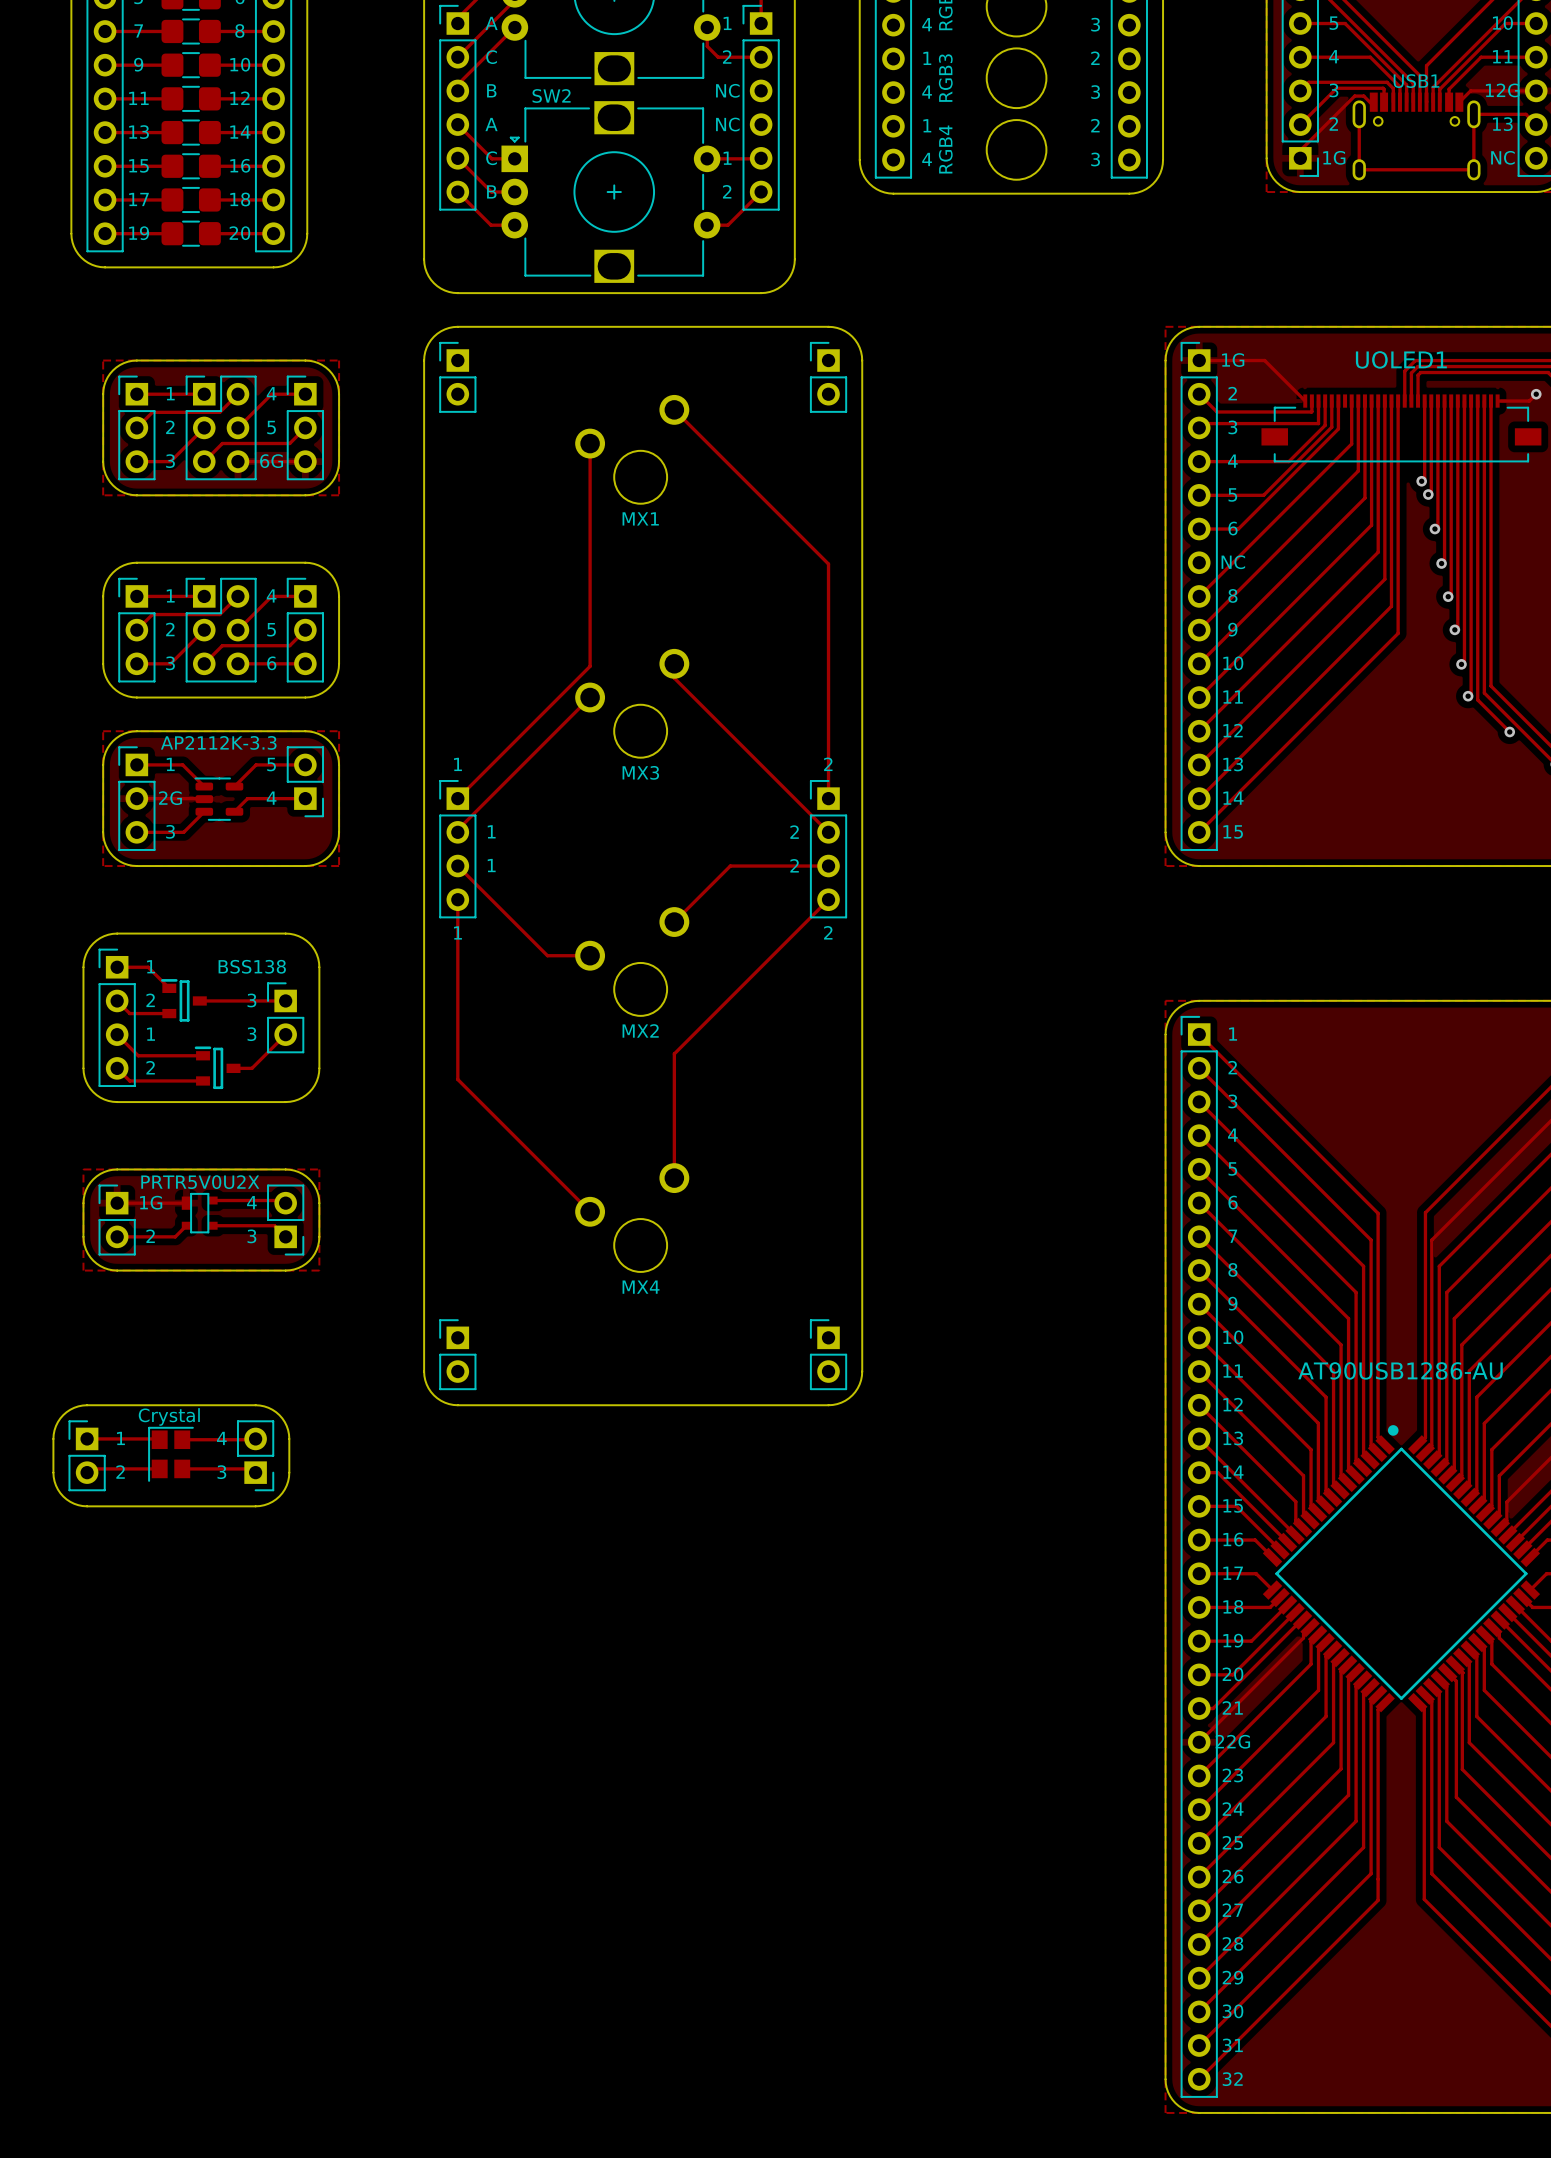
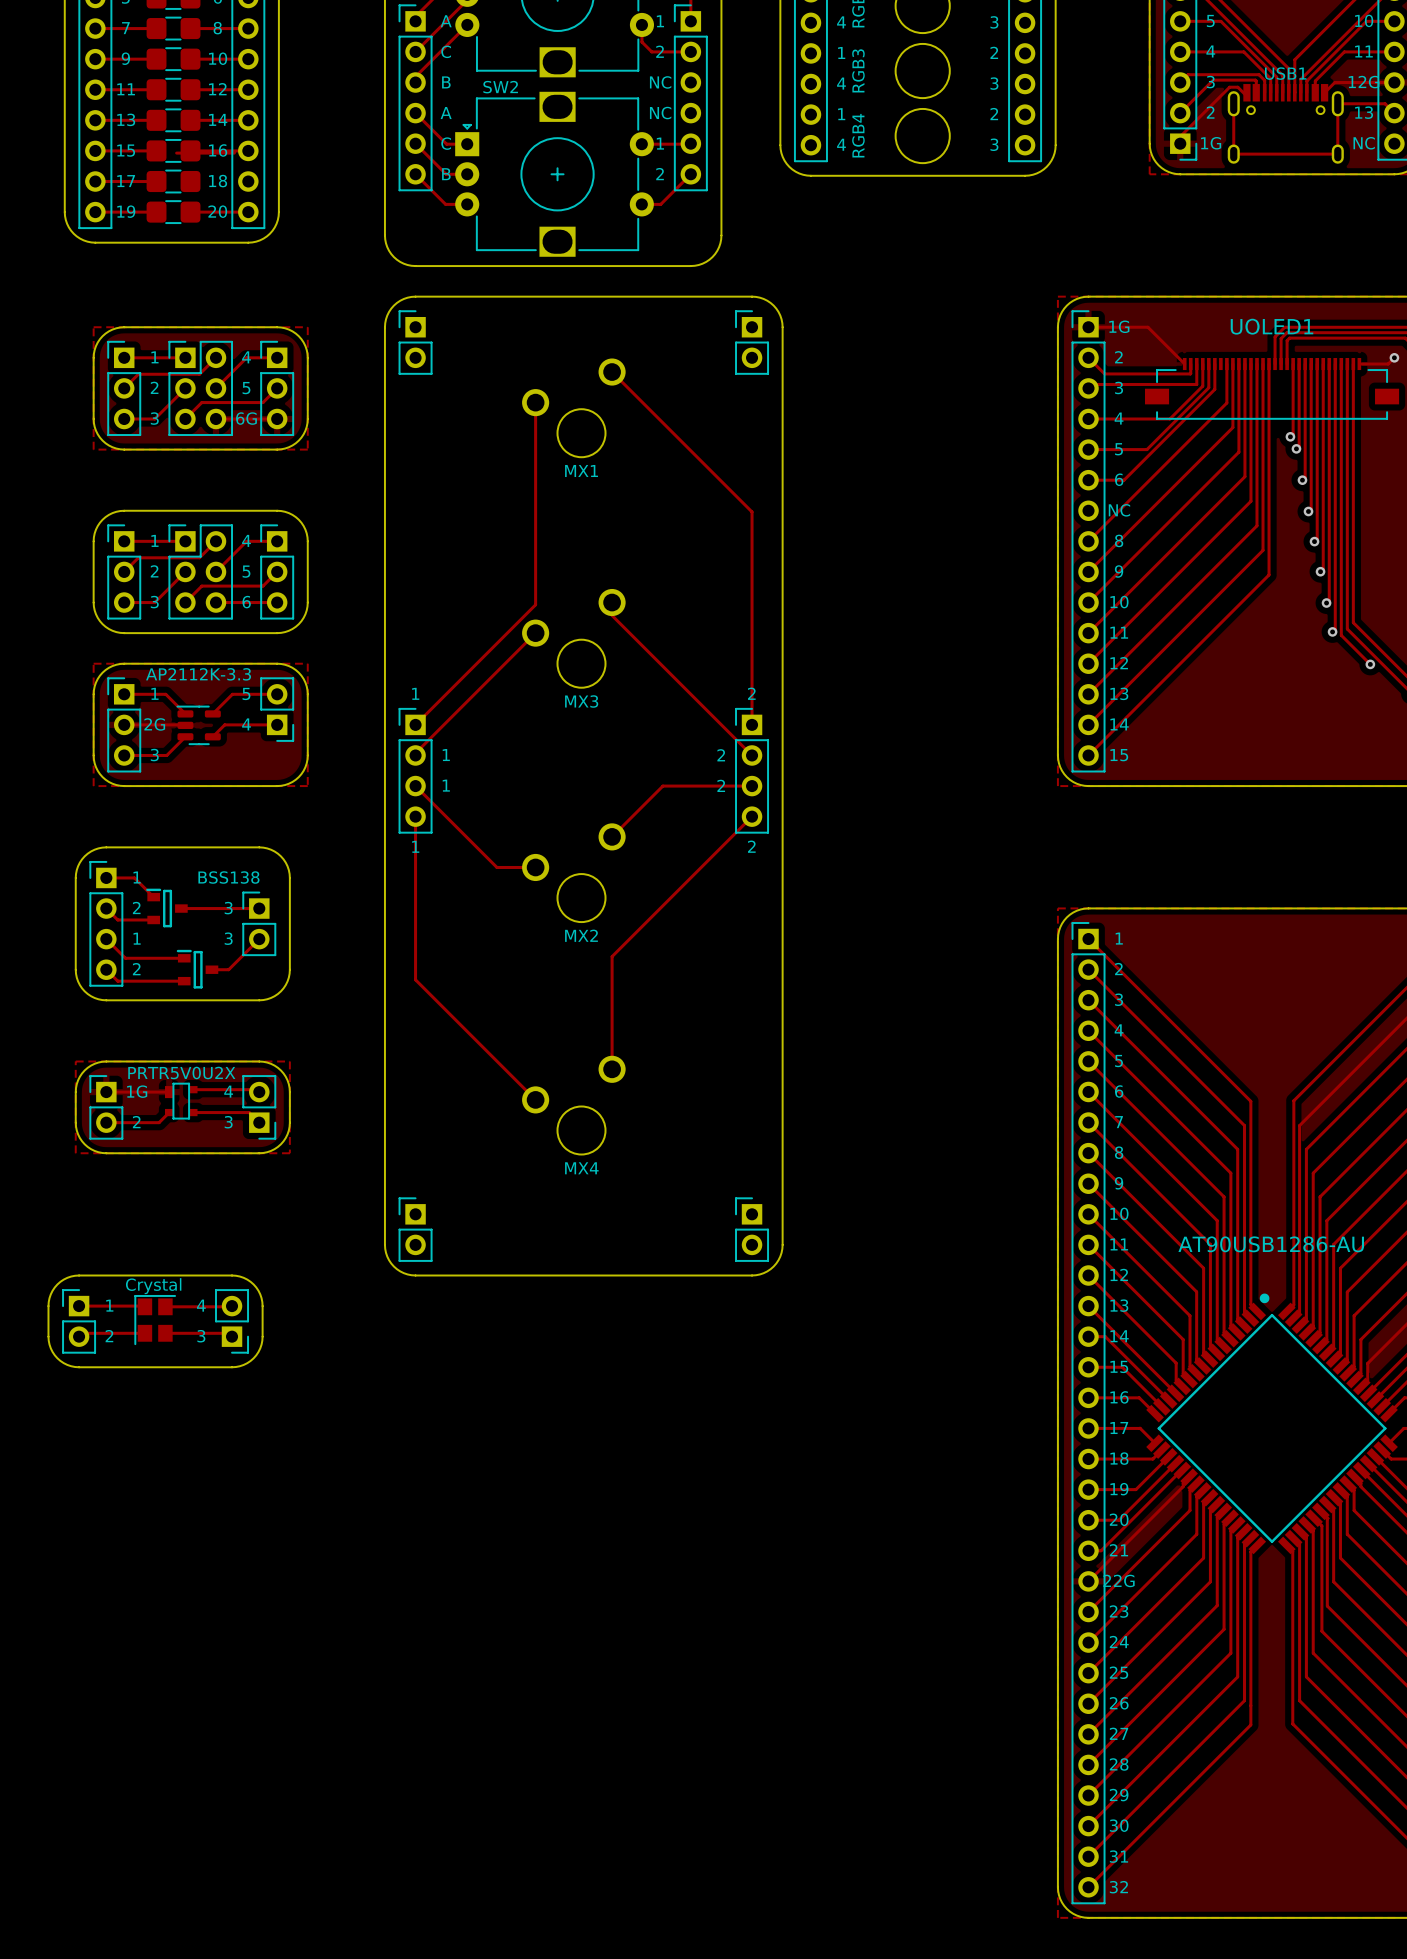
track: (209, 199) (273, 199) -> (176, 153) (234, 153)

